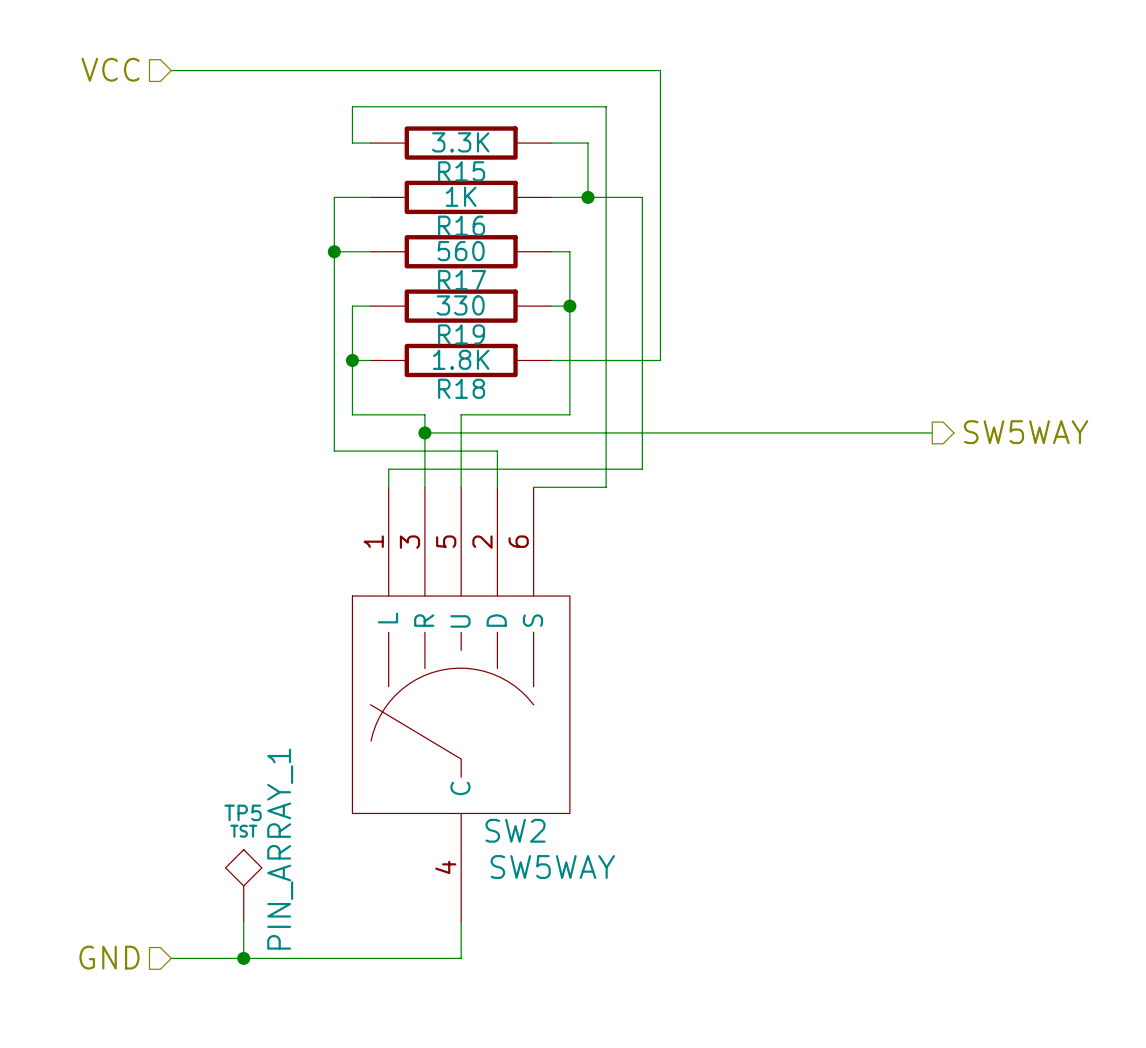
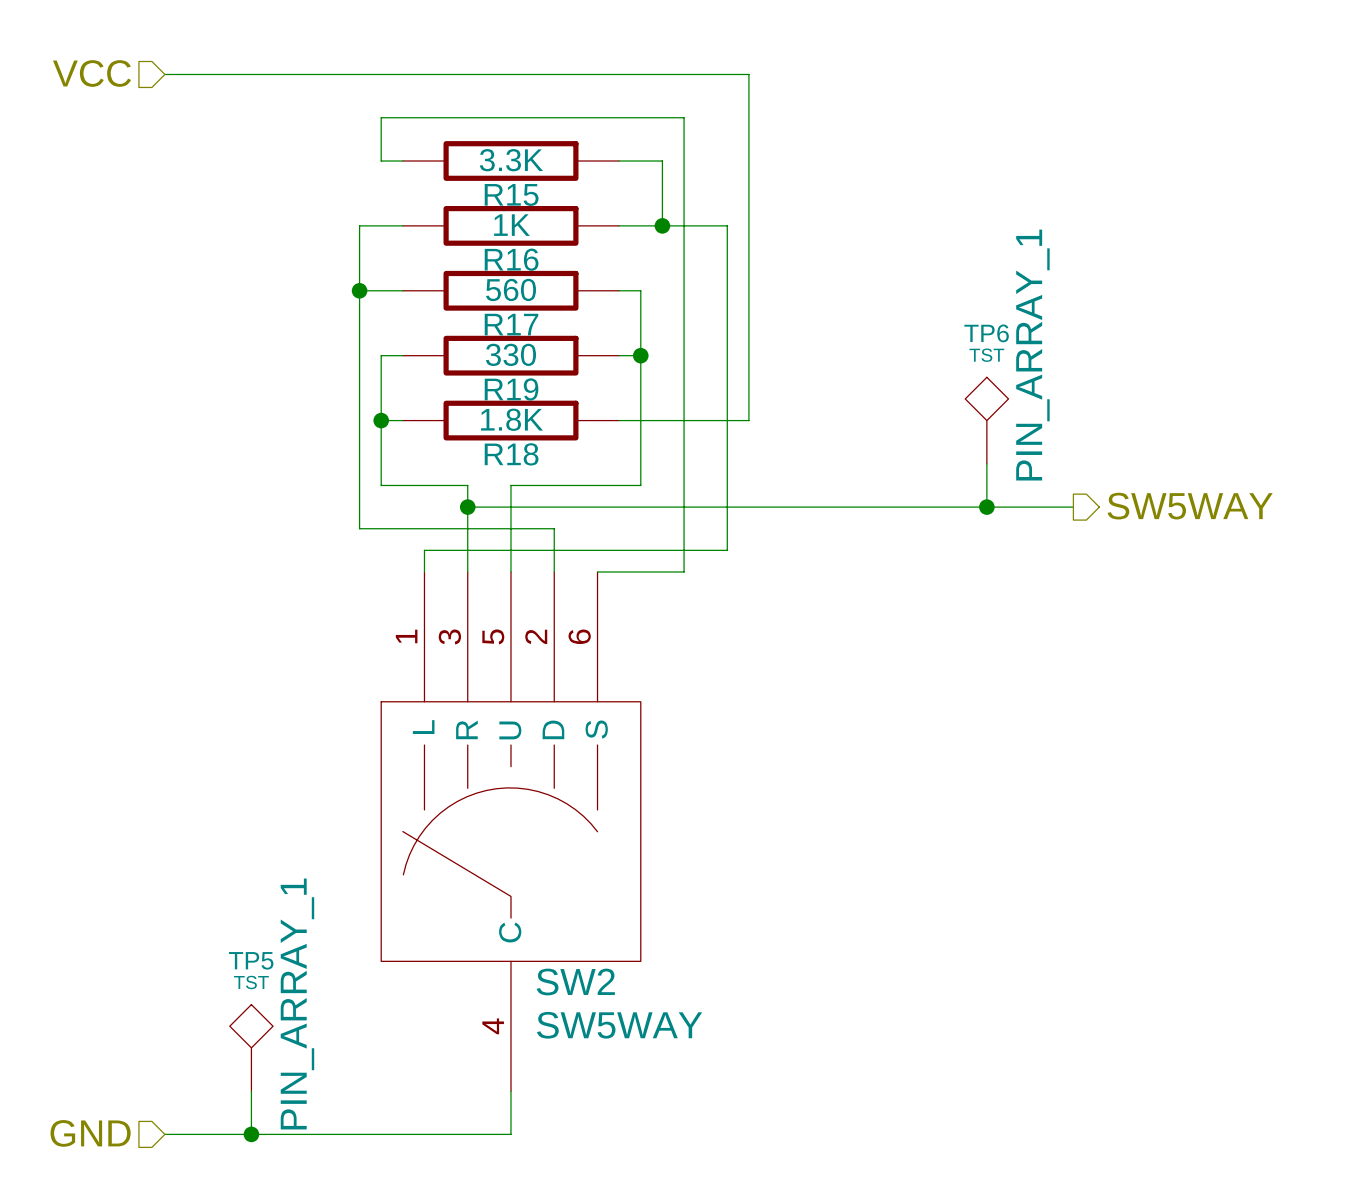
TP6: none -> TST (986, 420)
wire: none -> (986, 463) (986, 507)
junction: none -> (986, 507)

